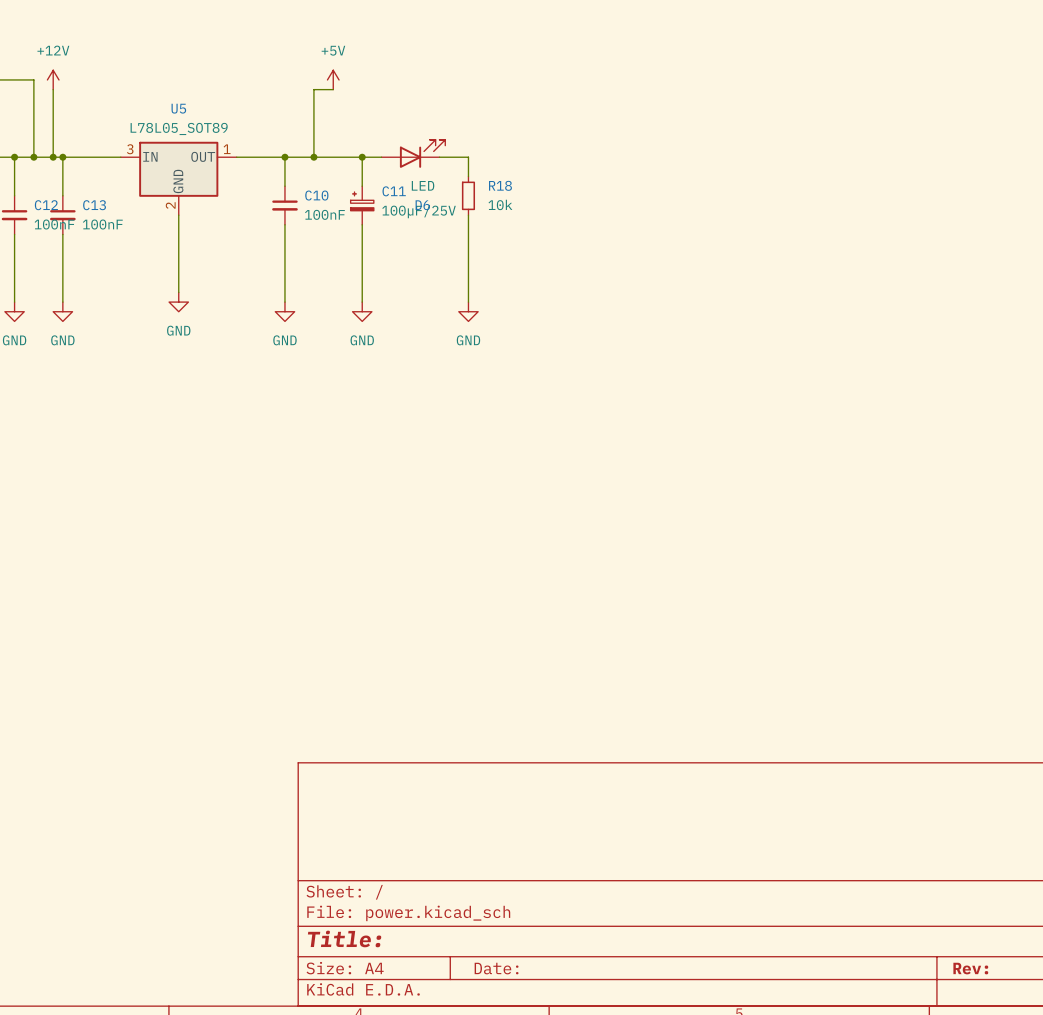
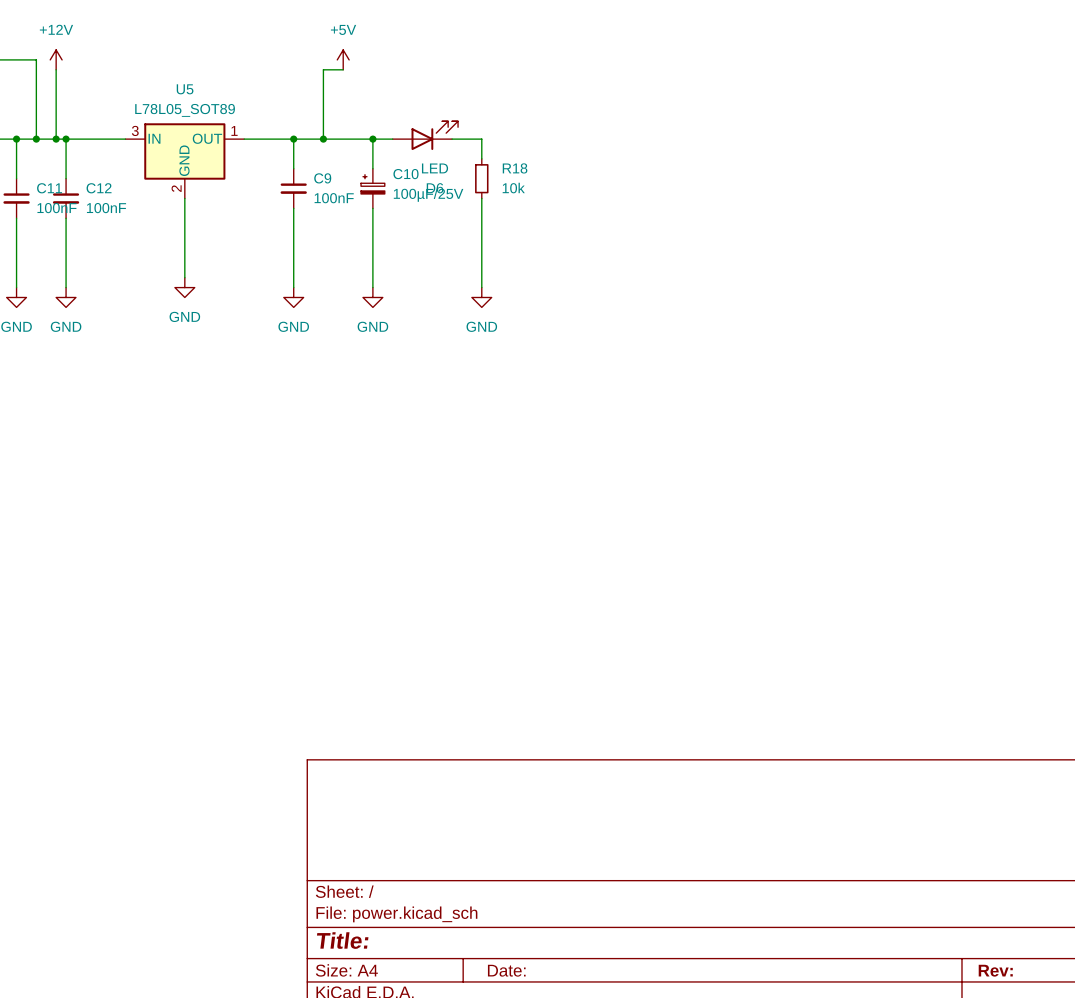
C11 name: C11 (394, 191) -> C10 (405, 174)
C10 name: C10 (316, 195) -> C9 (322, 178)
C12 name: C12 (46, 205) -> C11 (49, 188)
C13 name: C13 (94, 205) -> C12 (99, 188)

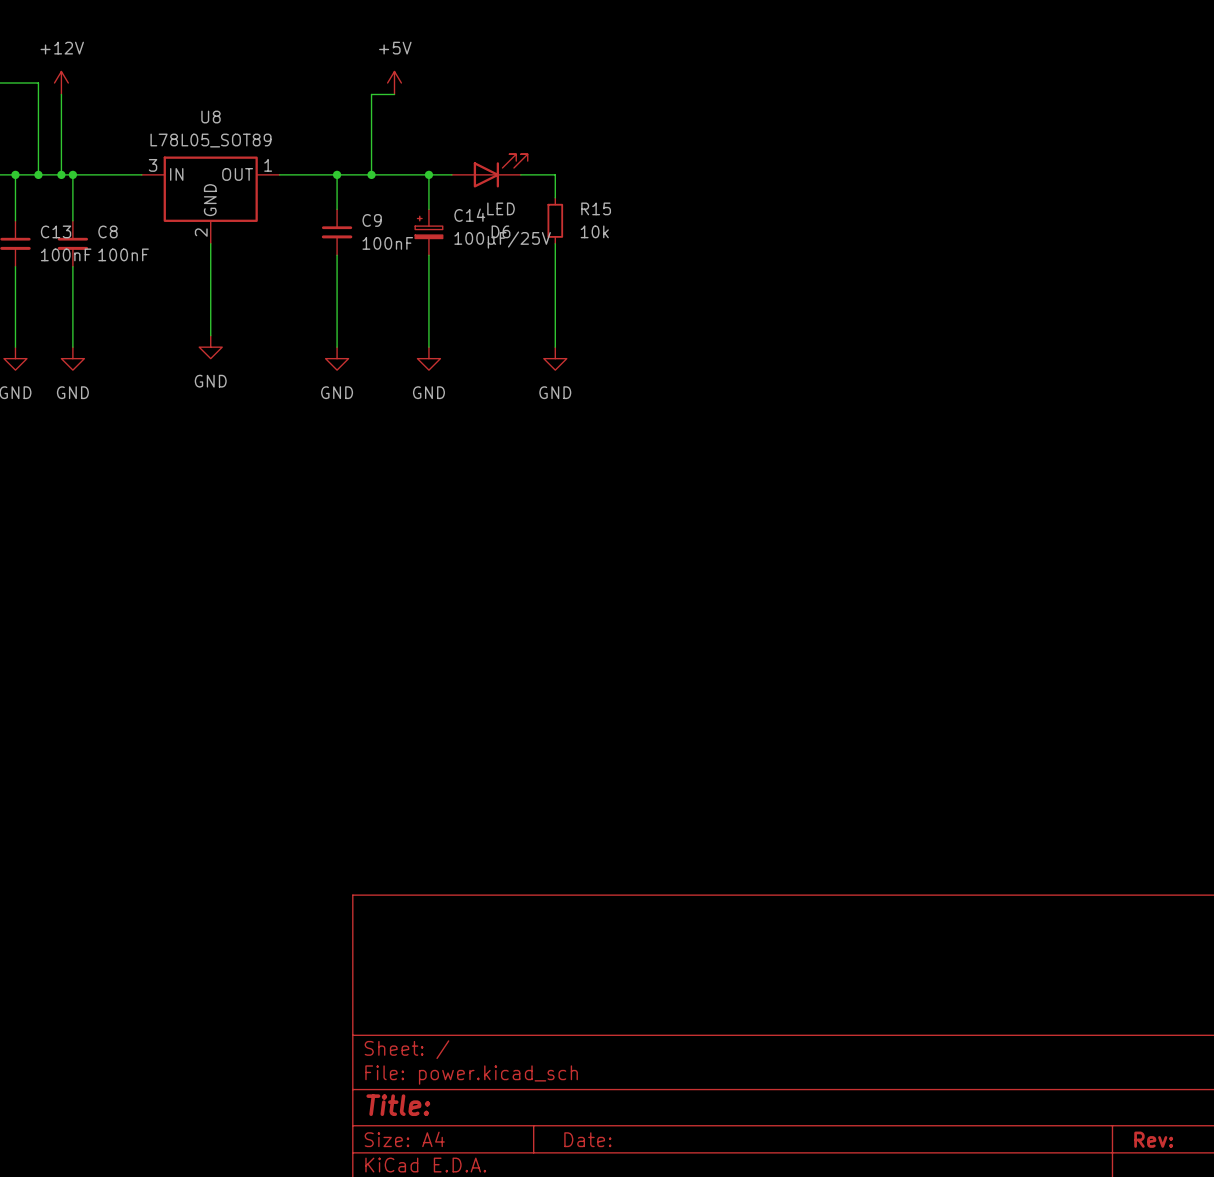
U5 name: U5 (185, 89) -> U8 (211, 117)
R18 name: R18 (515, 168) -> R15 (596, 208)
C10 name: C10 (405, 174) -> C14 (469, 215)
C11 name: C11 (49, 188) -> C13 (56, 231)
C12 name: C12 (99, 188) -> C8 (107, 231)

